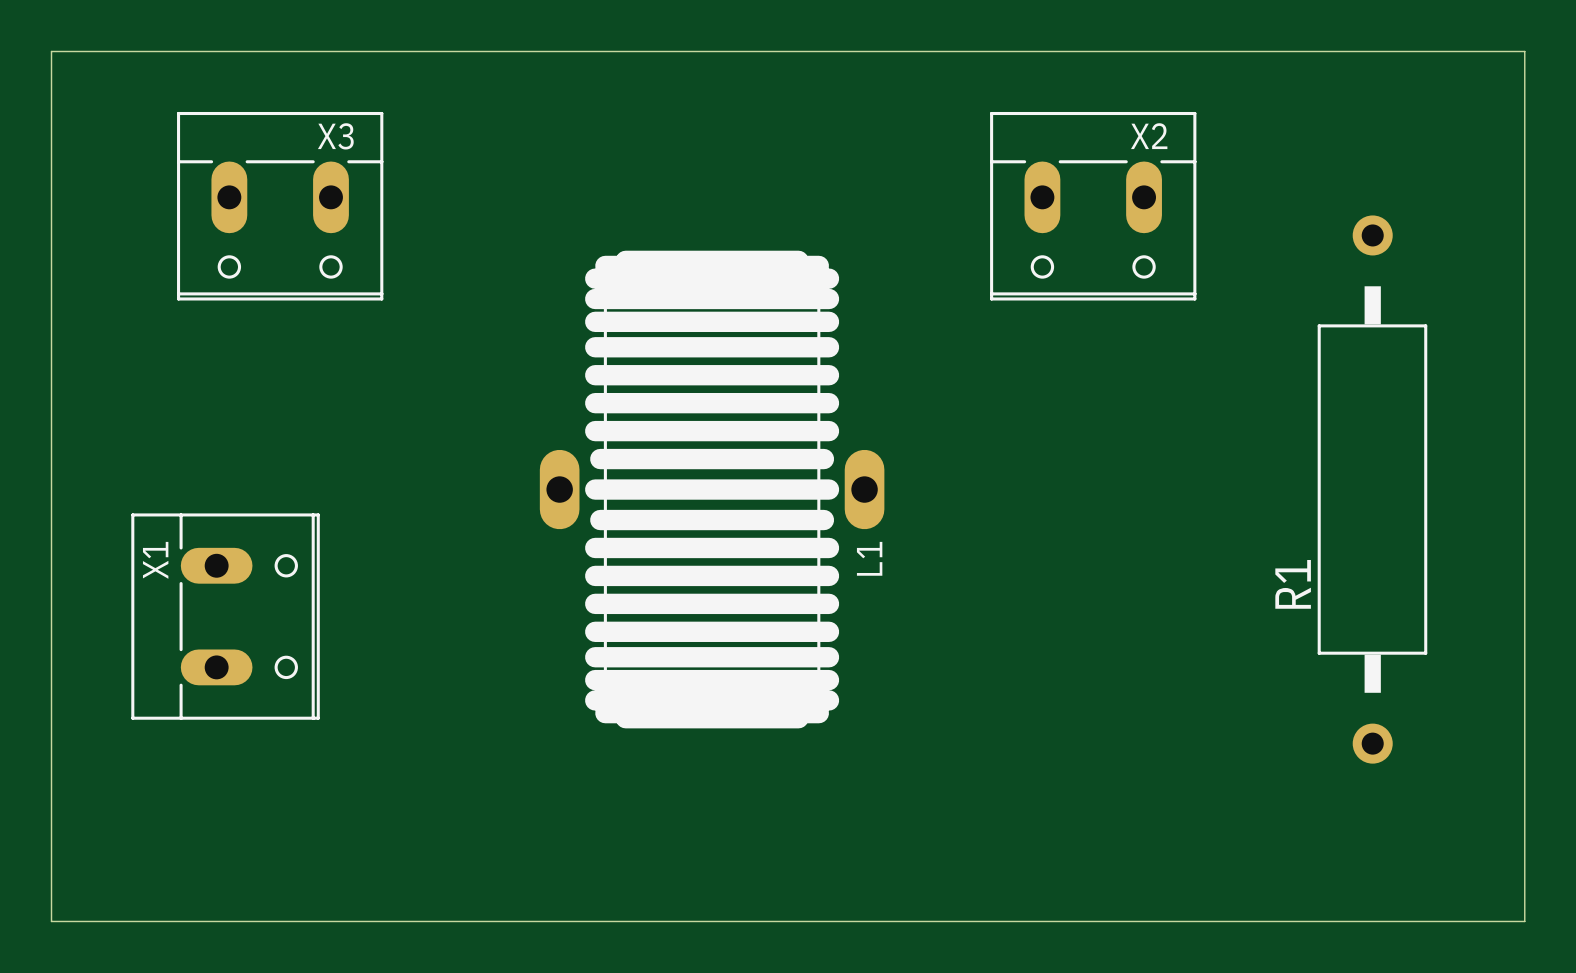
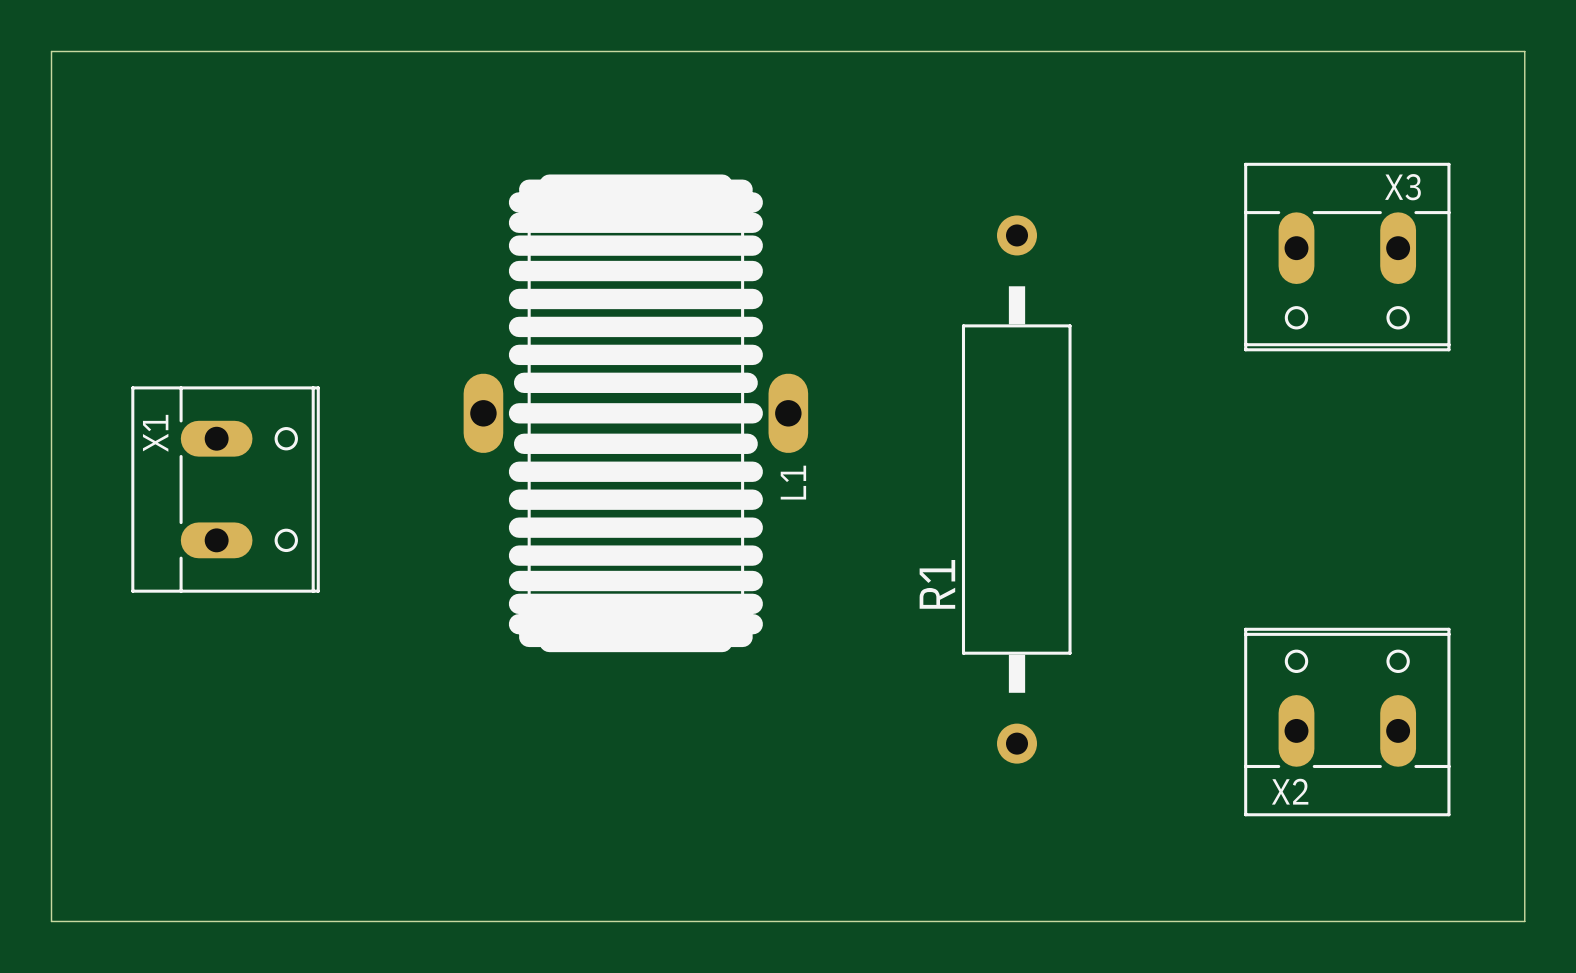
X3 position: (280, 206) -> (1347, 257)
X2 rotation: 0° (1093, 206) -> 180° (1347, 722)
X2 position: (1093, 206) -> (1347, 722)
L1 position: (712, 489) -> (635, 413)
R1 position: (1372, 489) -> (1016, 489)
X1 position: (225, 616) -> (225, 489)

